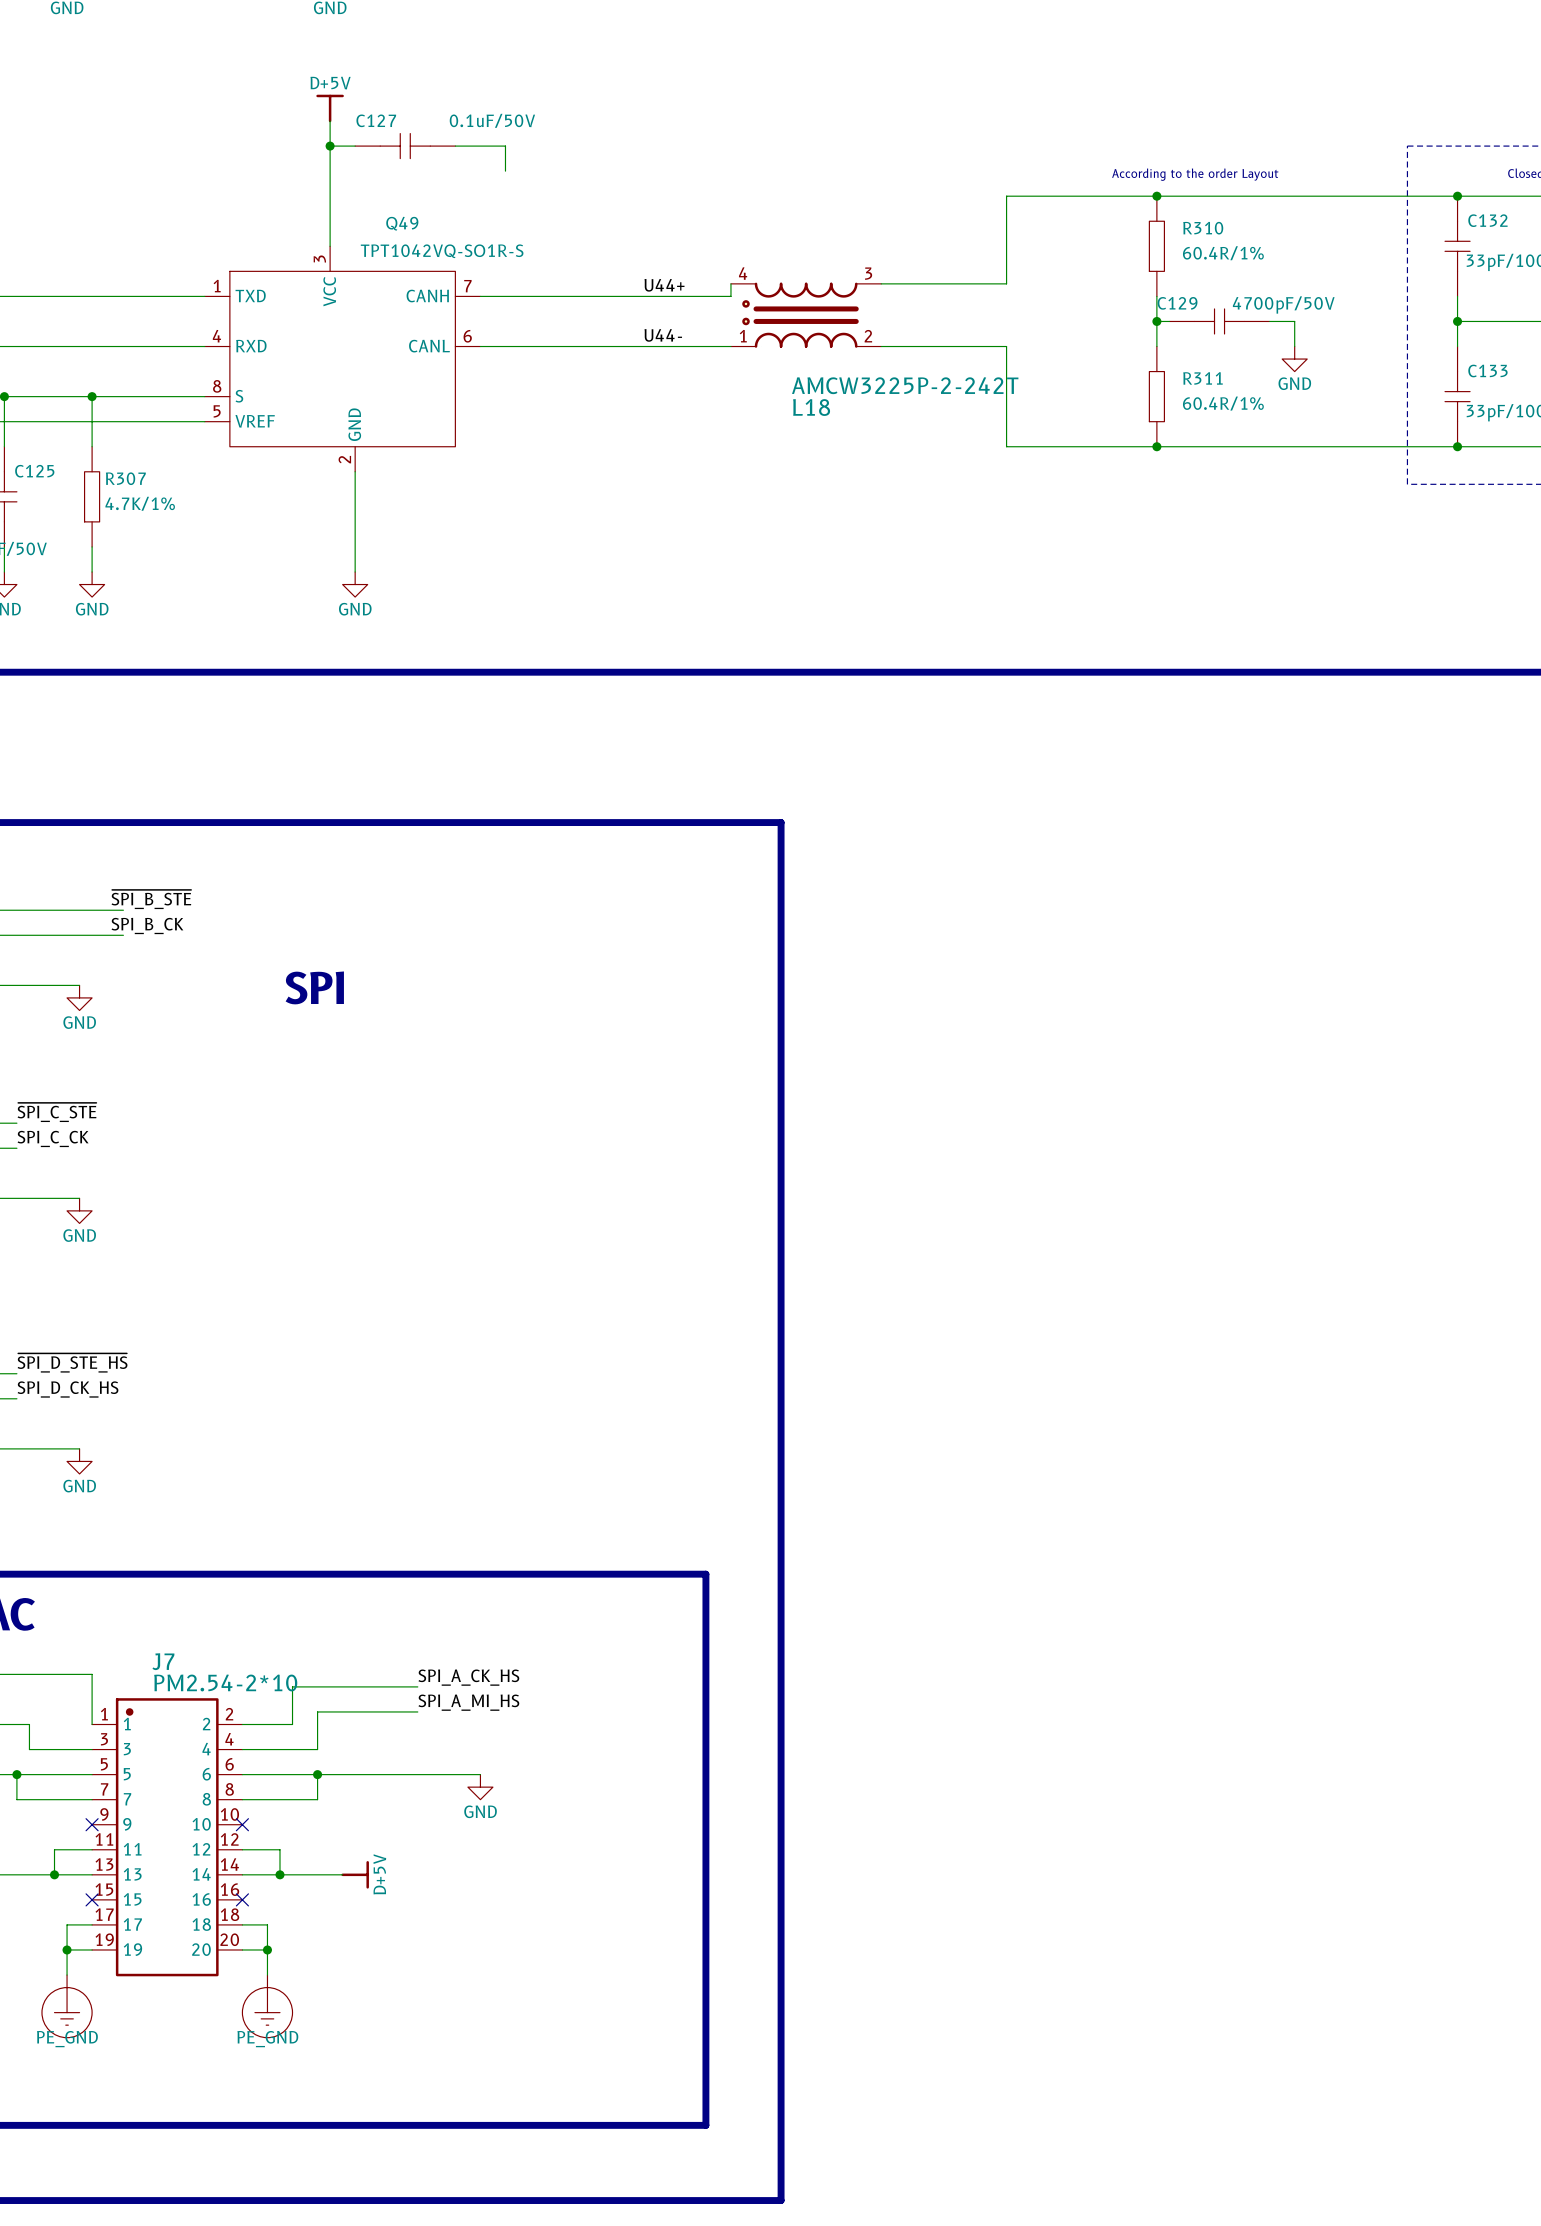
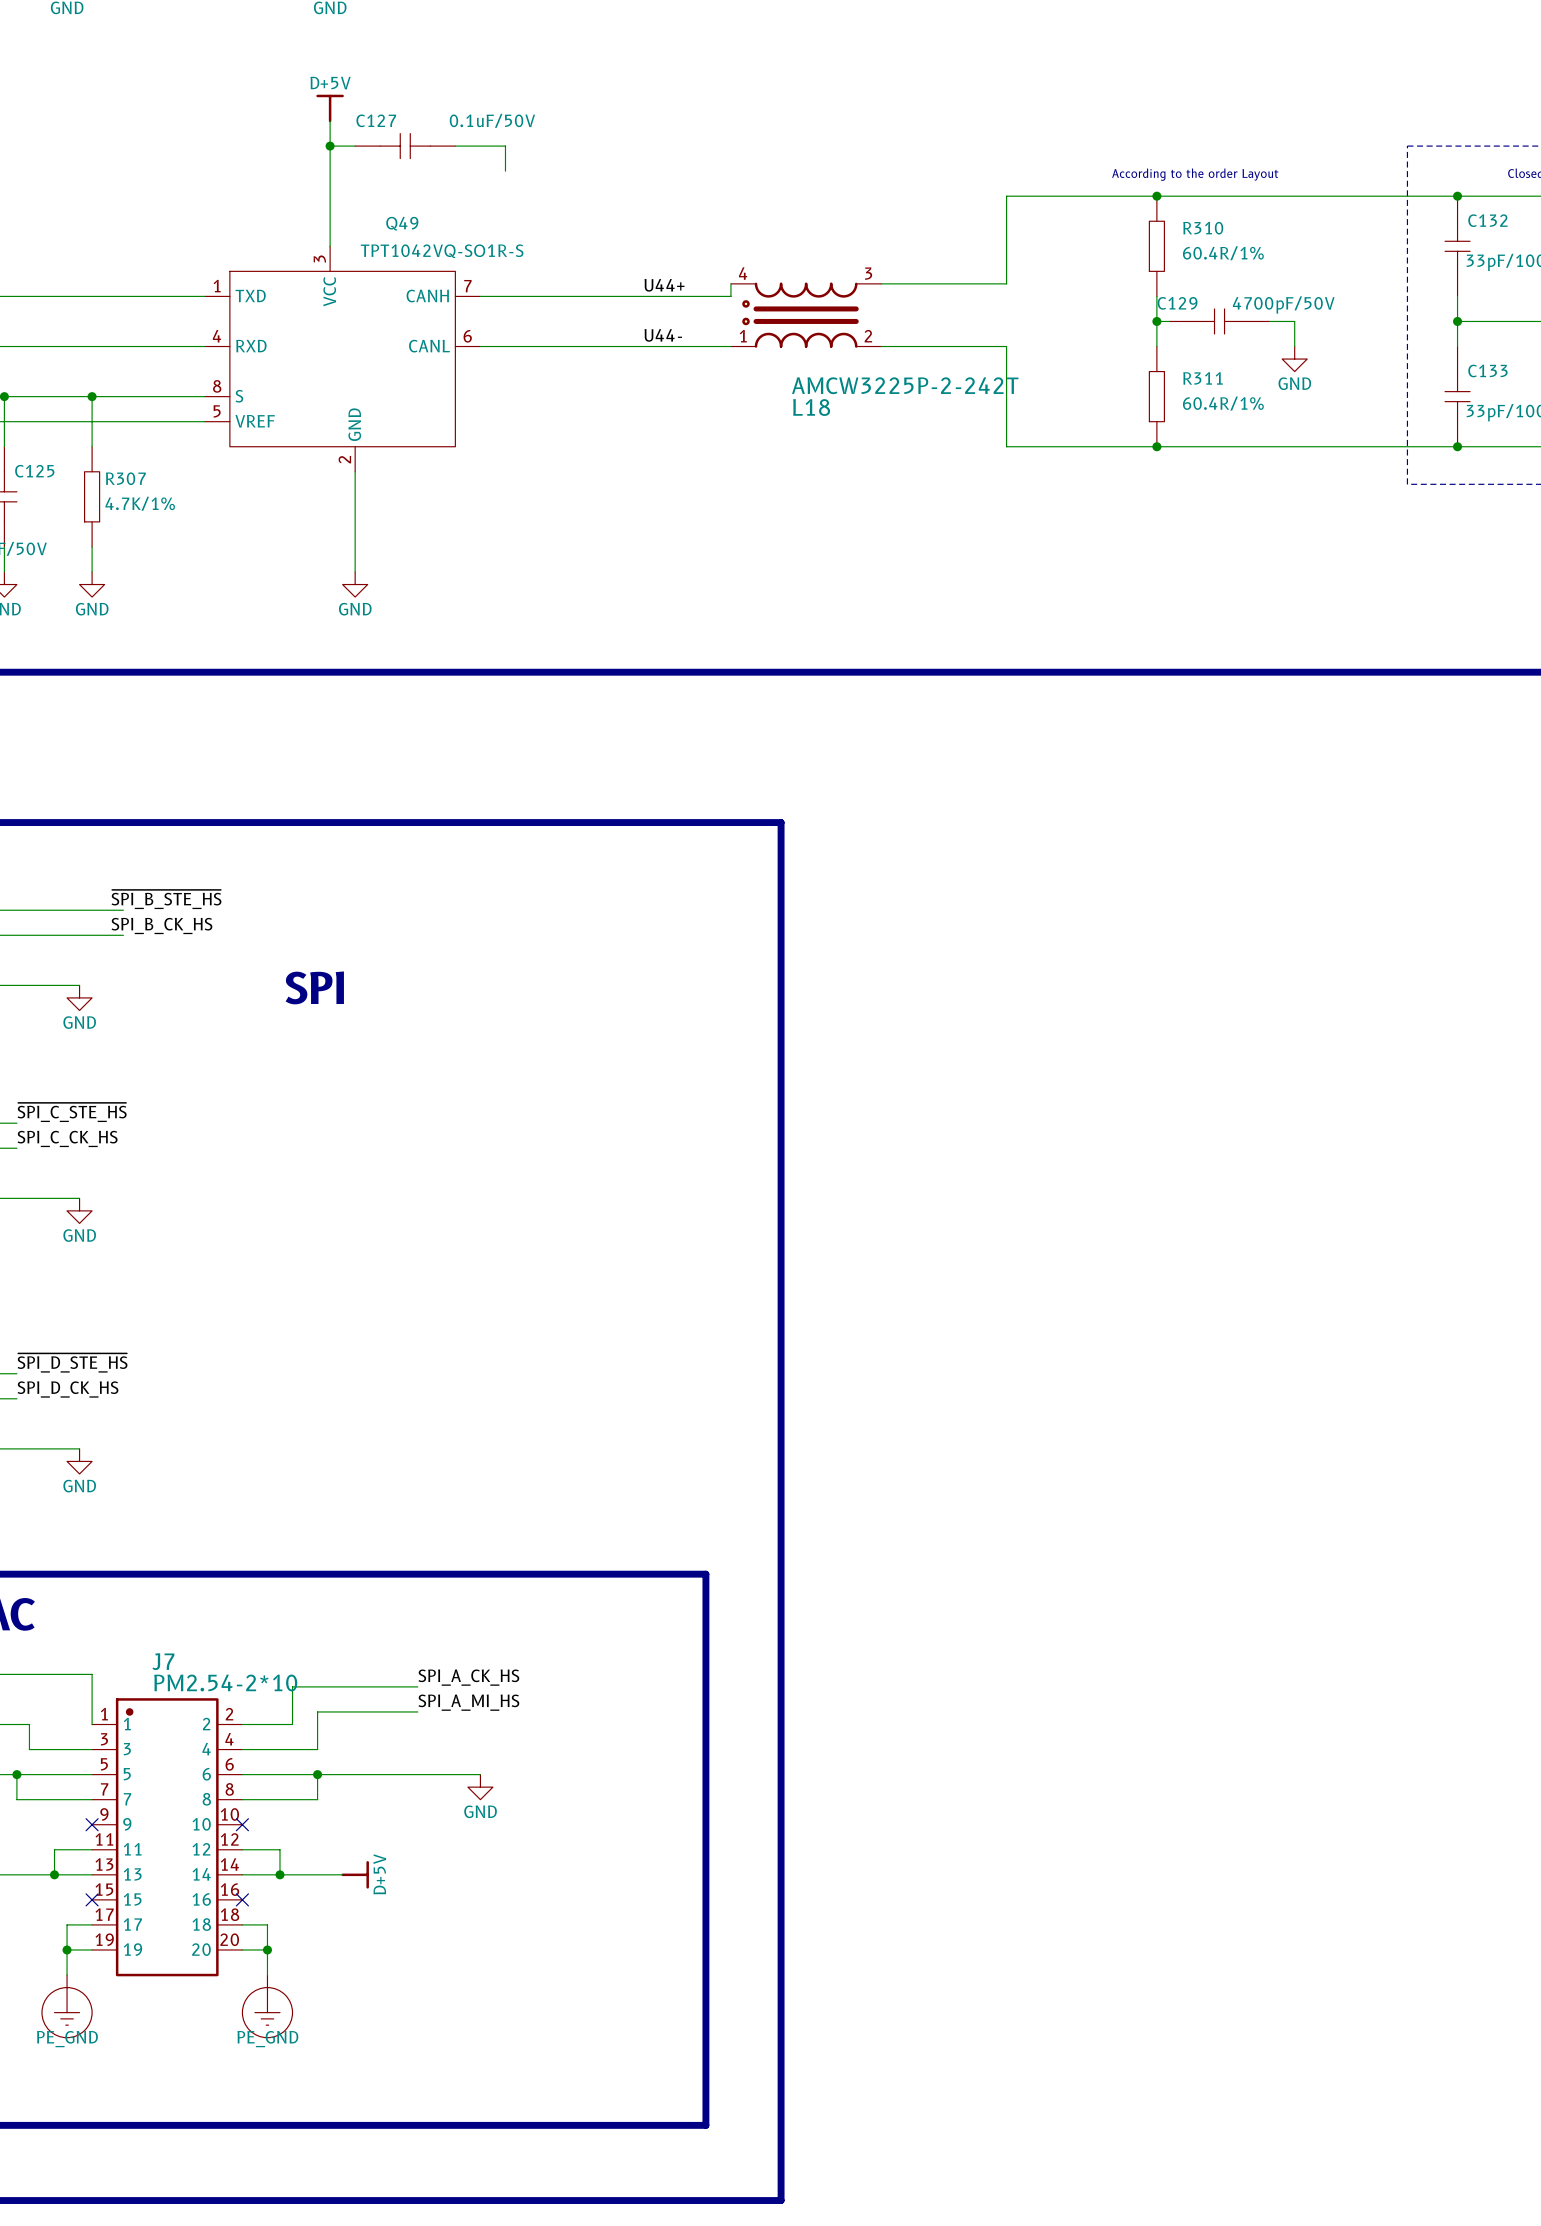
label: ~{SPI_B_STE} (151, 899) -> ~{SPI_B_STE_HS} (166, 899)
label: SPI_B_CK (147, 925) -> SPI_B_CK_HS (161, 925)
label: ~{SPI_C_STE} (57, 1112) -> ~{SPI_C_STE_HS} (72, 1112)
label: SPI_C_CK (53, 1138) -> SPI_C_CK_HS (67, 1138)

